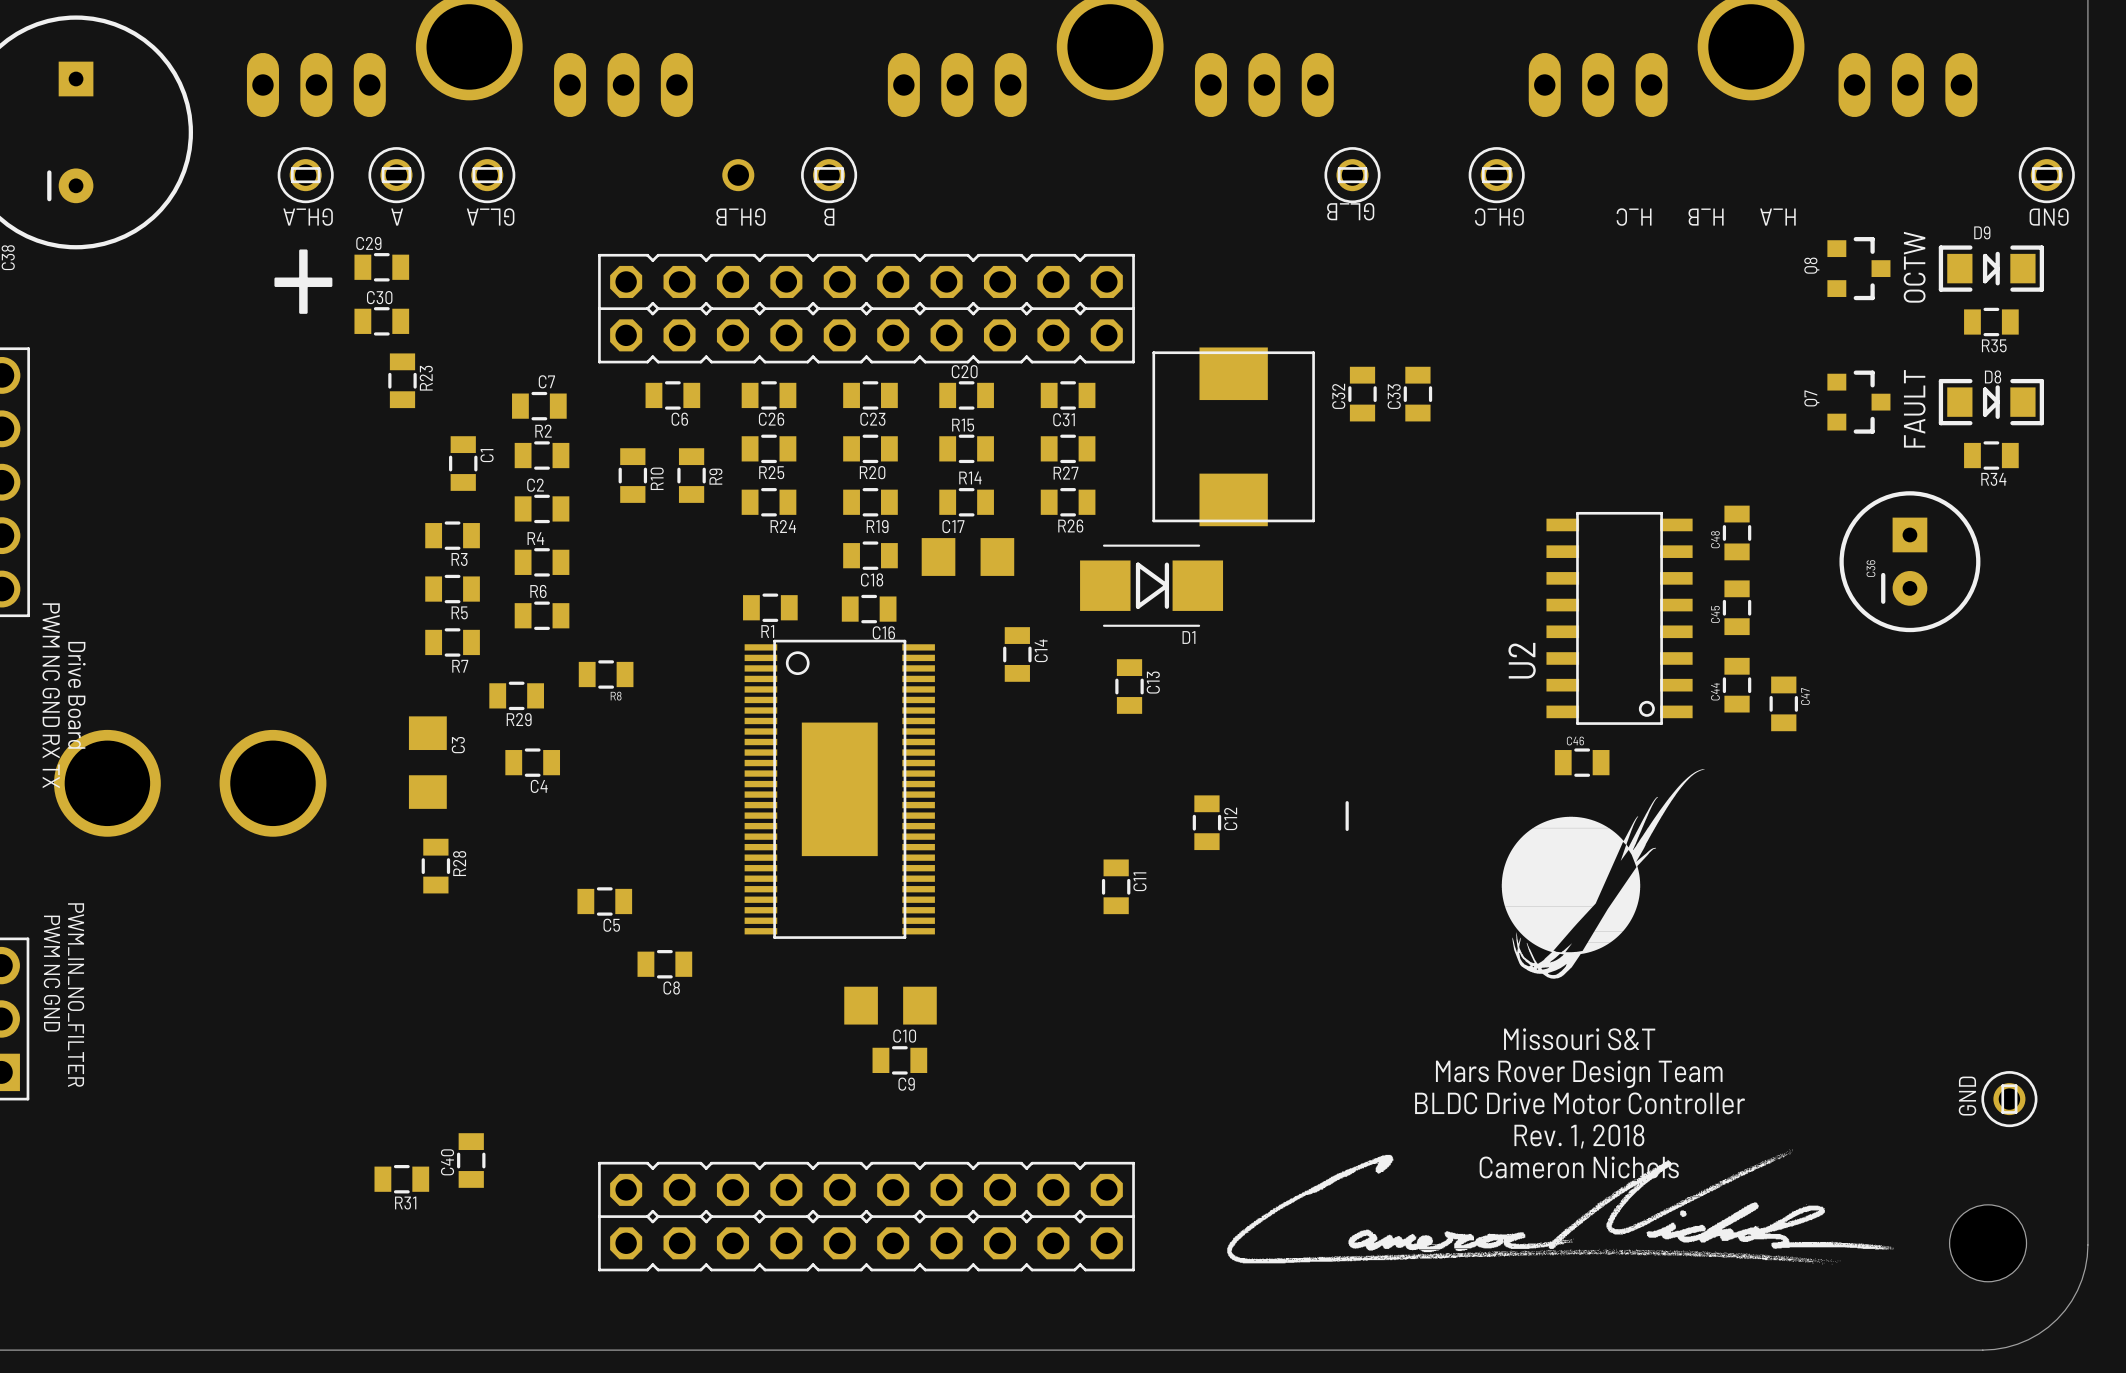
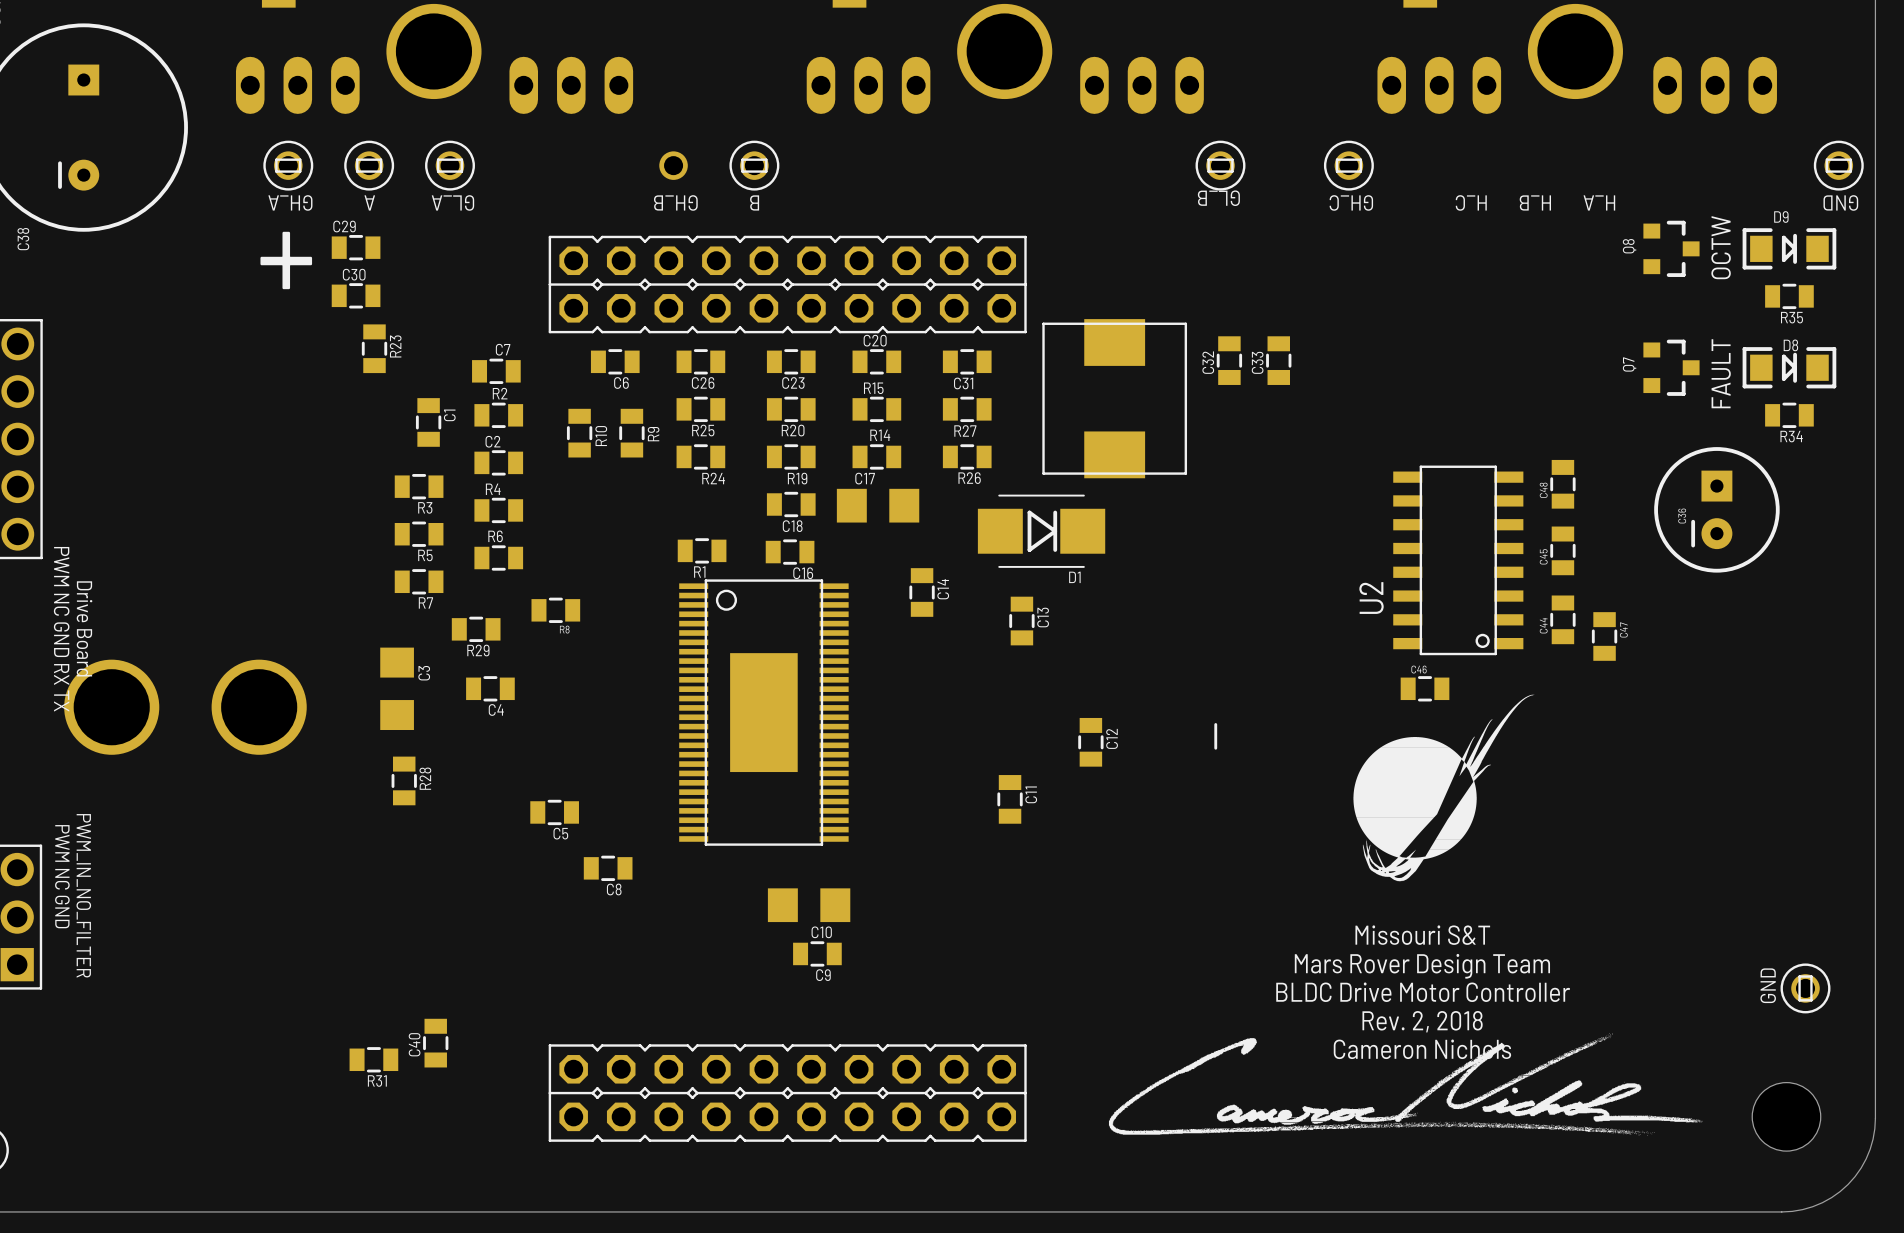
text: Rev. 1, 2018 (1579, 1136) -> Rev. 2, 2018 (1422, 1021)

